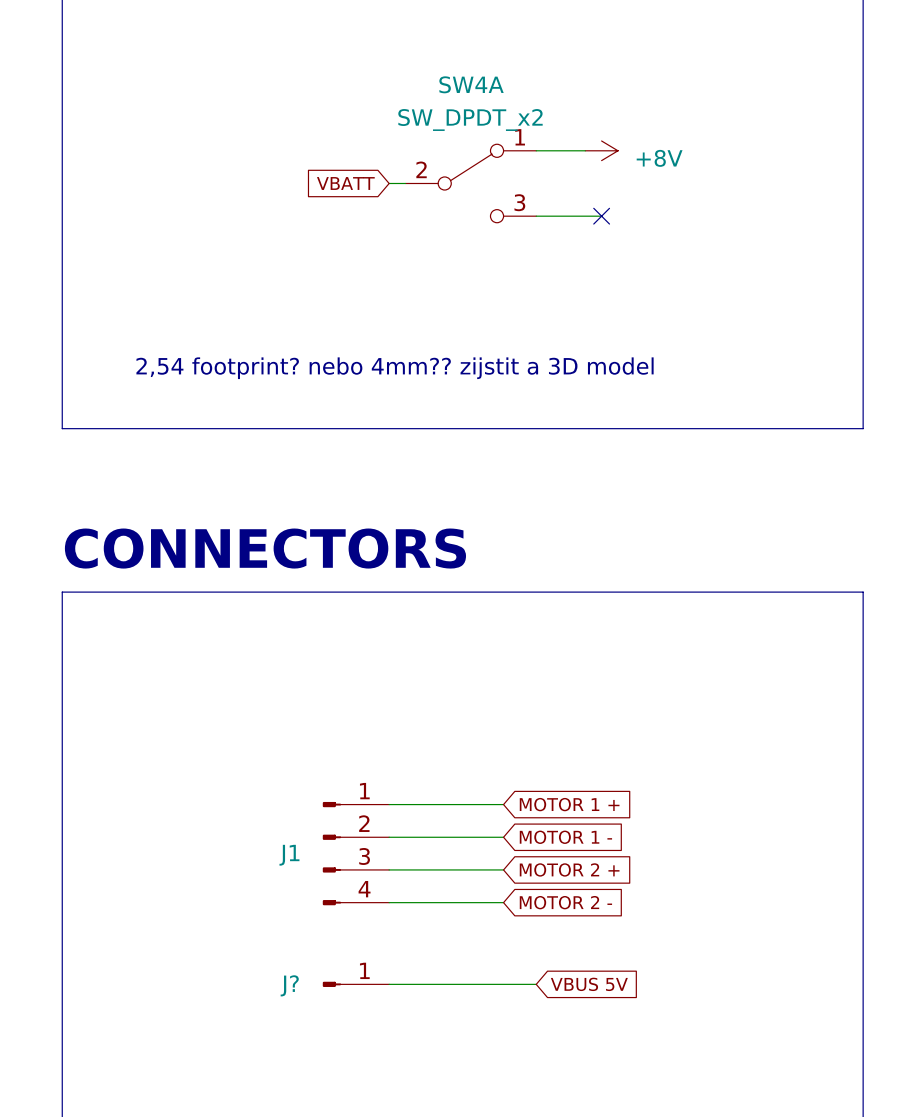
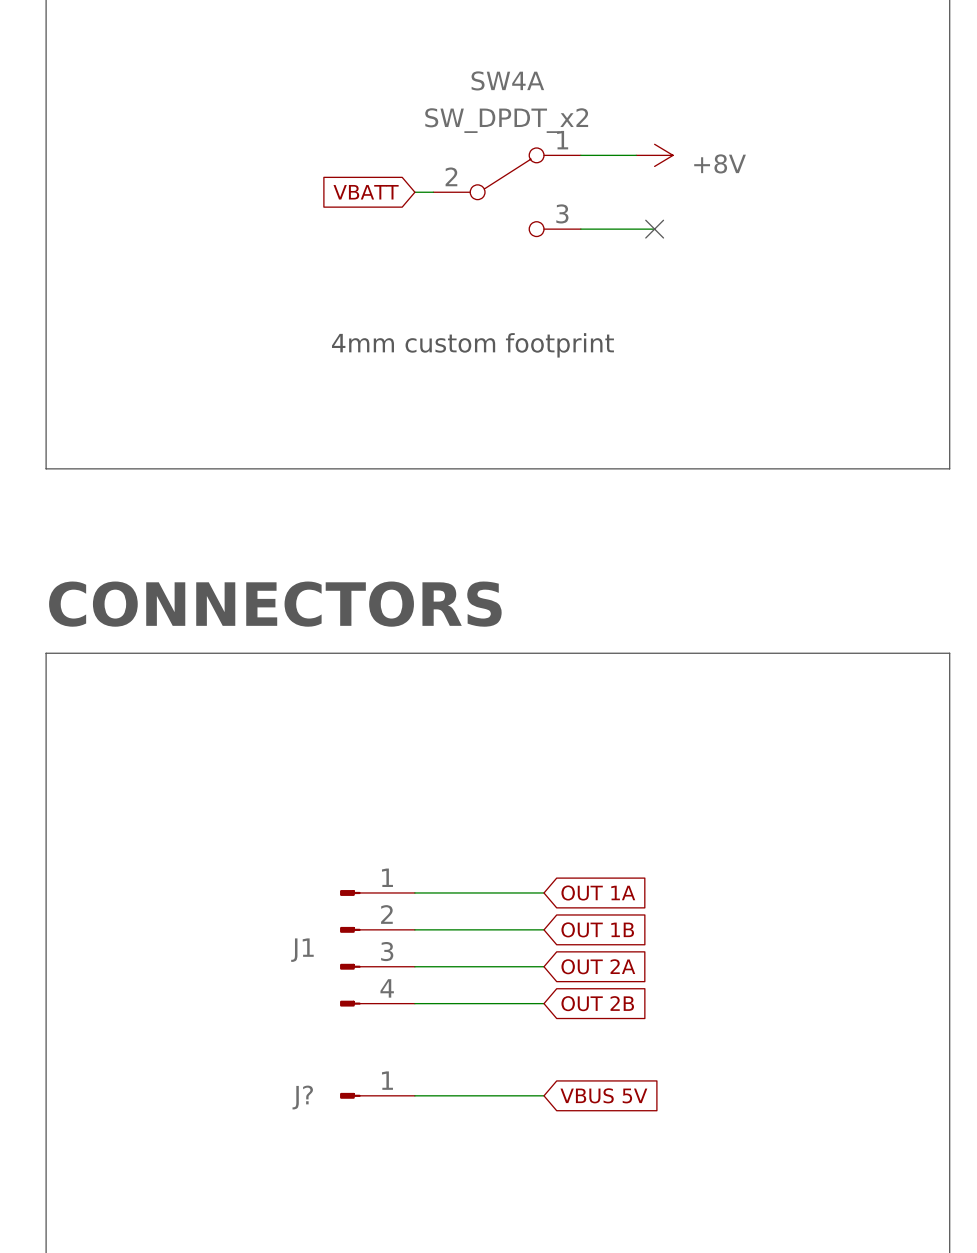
text: none -> 4mm custom footprint (472, 345)
text: 2,54 footprint? nebo 4mm?? zijstit a 3D model (395, 368) -> none
global label: MOTOR 1 + (569, 804) -> OUT 1A (598, 892)
global label: MOTOR 1 - (565, 837) -> OUT 1B (597, 929)
global label: MOTOR 2 + (569, 869) -> OUT 2A (598, 966)
global label: MOTOR 2 - (565, 902) -> OUT 2B (597, 1003)
wire: (503, 984) (536, 984) -> none
global label position: VBUS 5V (589, 984) -> VBUS 5V (603, 1095)

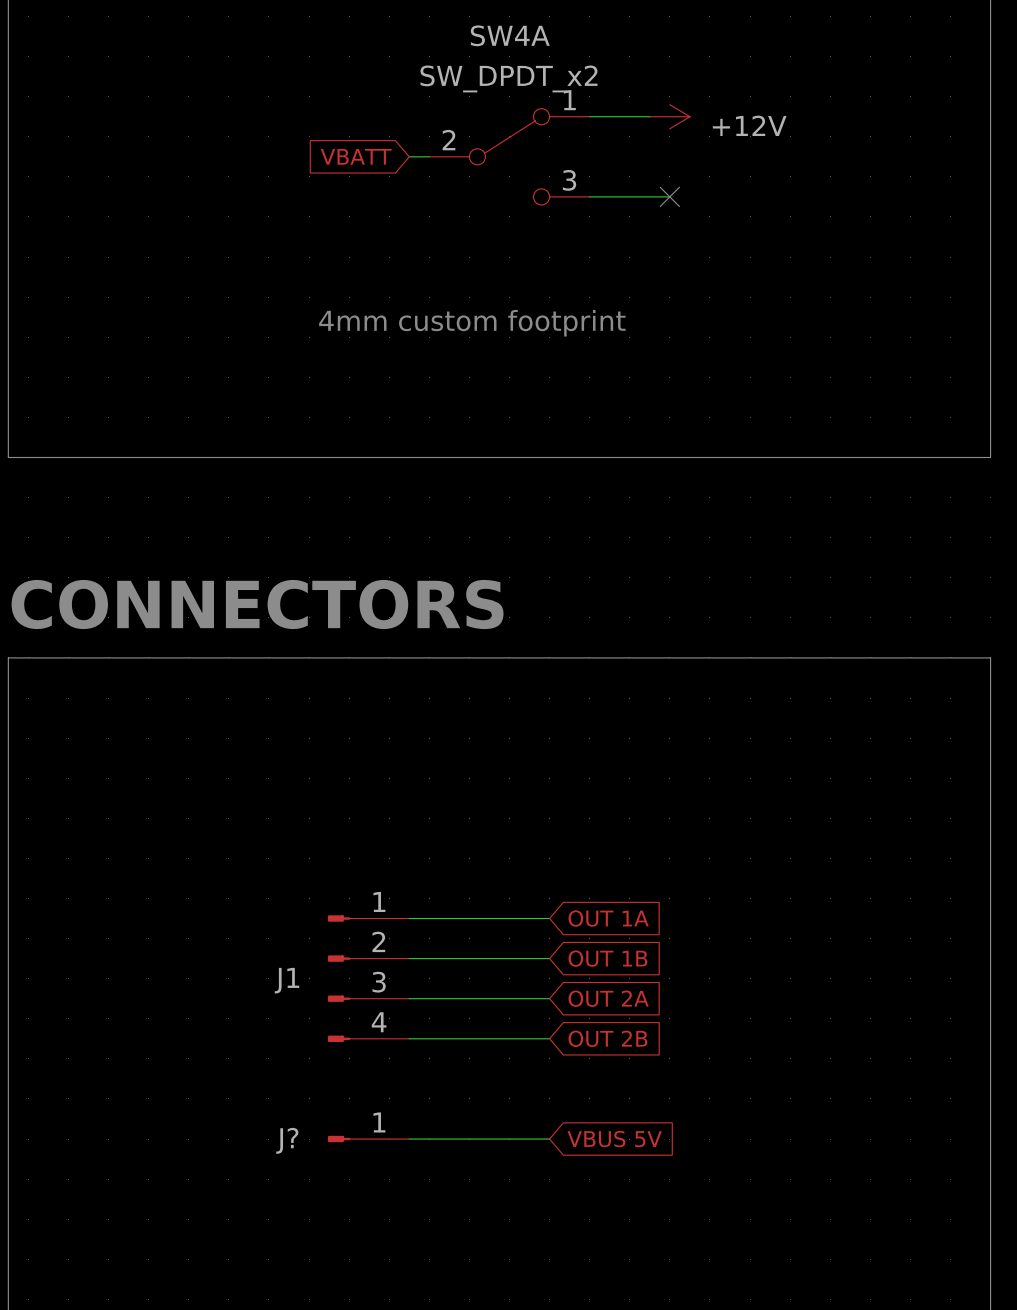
power symbol: +8V (654, 155) -> +12V (669, 116)

